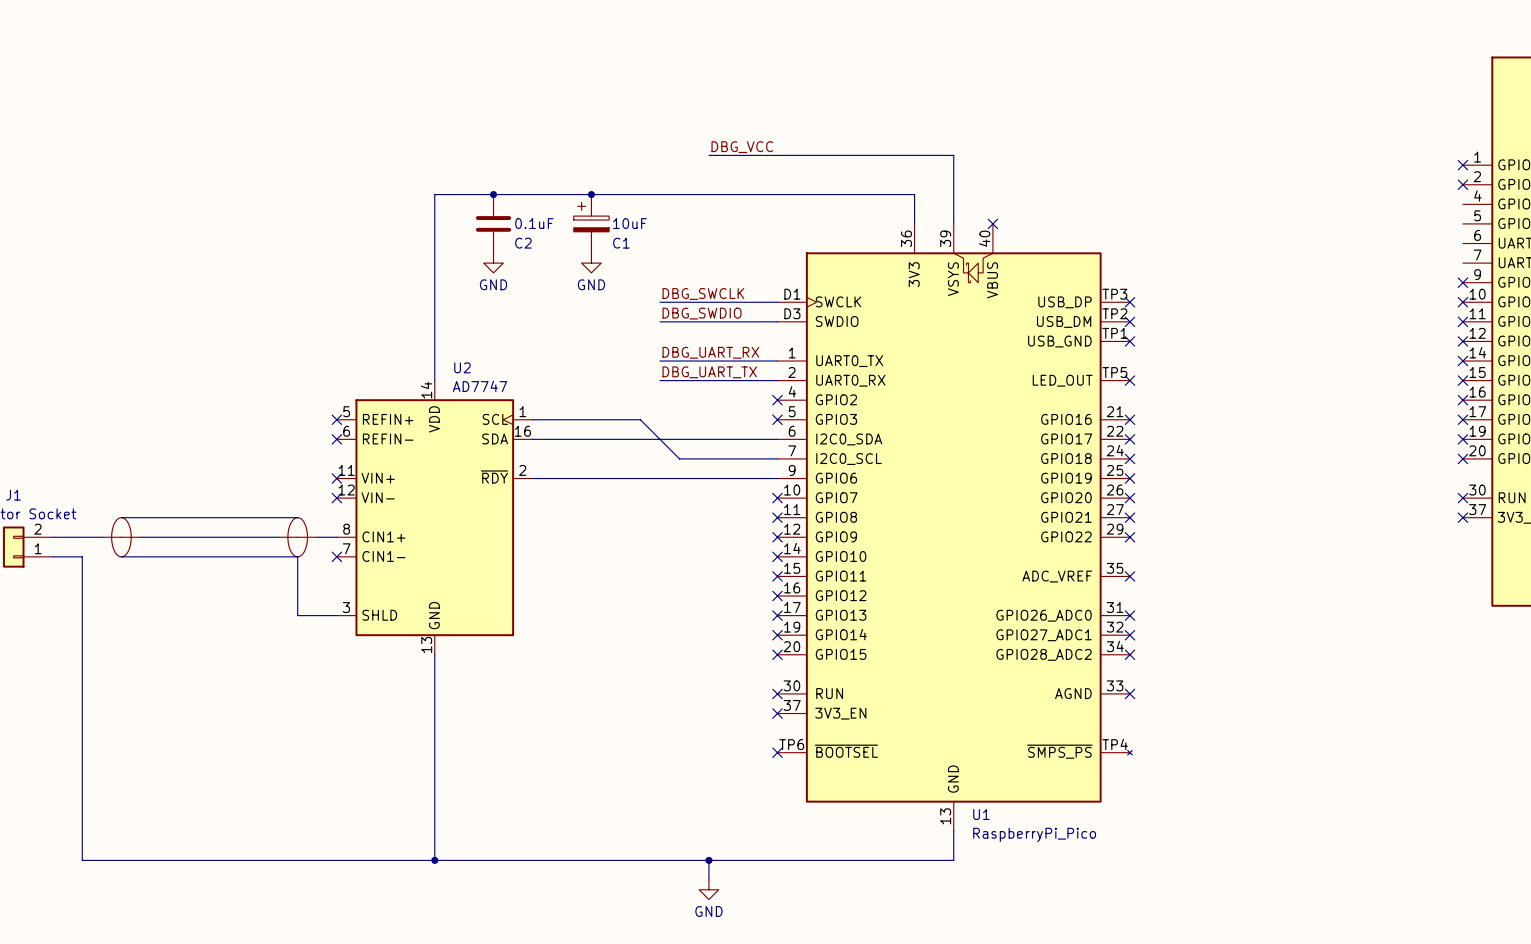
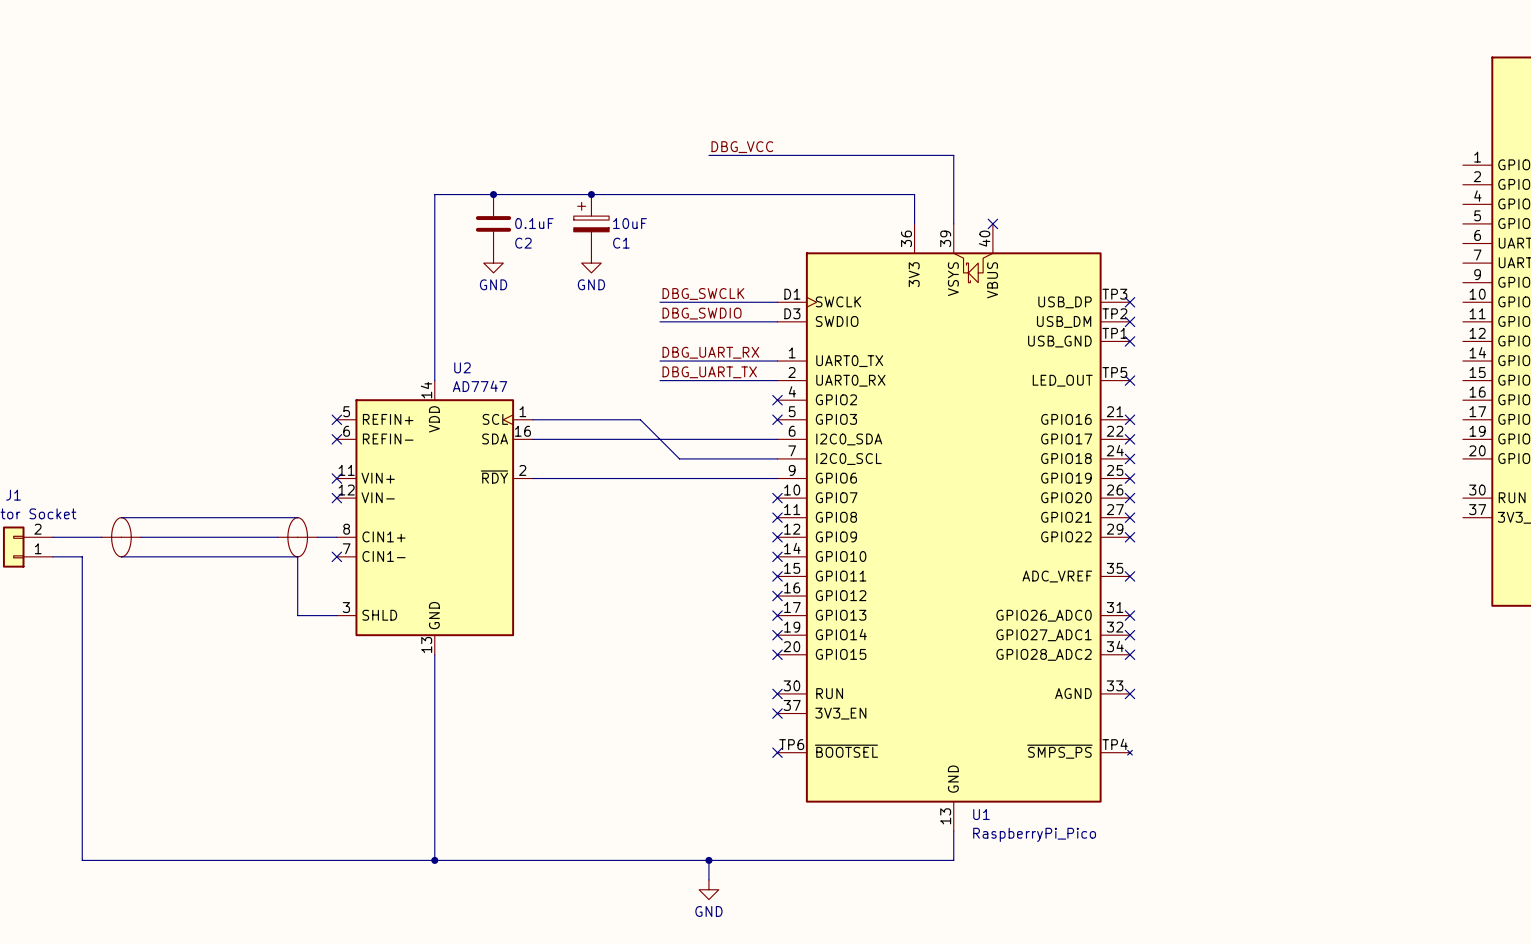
no-connect mark: (1462, 165) -> none
no-connect mark: (1462, 184) -> none
no-connect mark: (1462, 282) -> none
no-connect mark: (1462, 302) -> none
no-connect mark: (1462, 321) -> none
no-connect mark: (1462, 341) -> none
no-connect mark: (1462, 361) -> none
no-connect mark: (1462, 380) -> none
no-connect mark: (1462, 400) -> none
no-connect mark: (1462, 419) -> none
no-connect mark: (1462, 439) -> none
no-connect mark: (1462, 458) -> none
no-connect mark: (1462, 498) -> none
no-connect mark: (1462, 517) -> none

